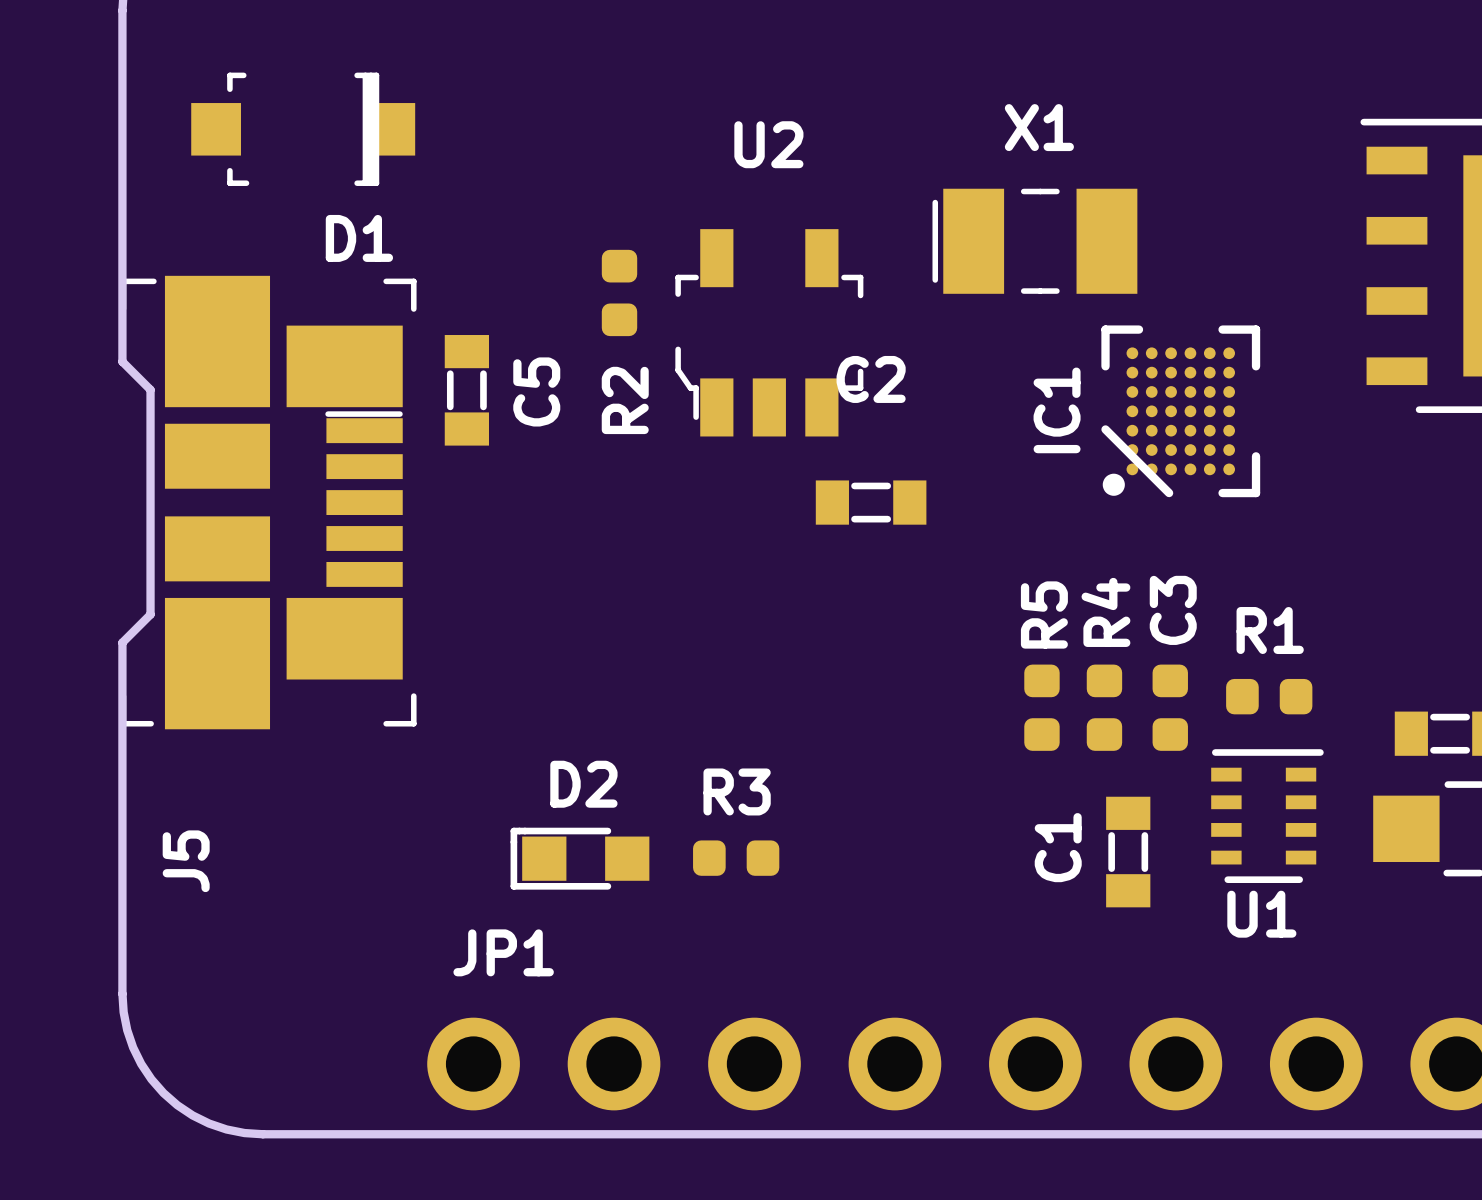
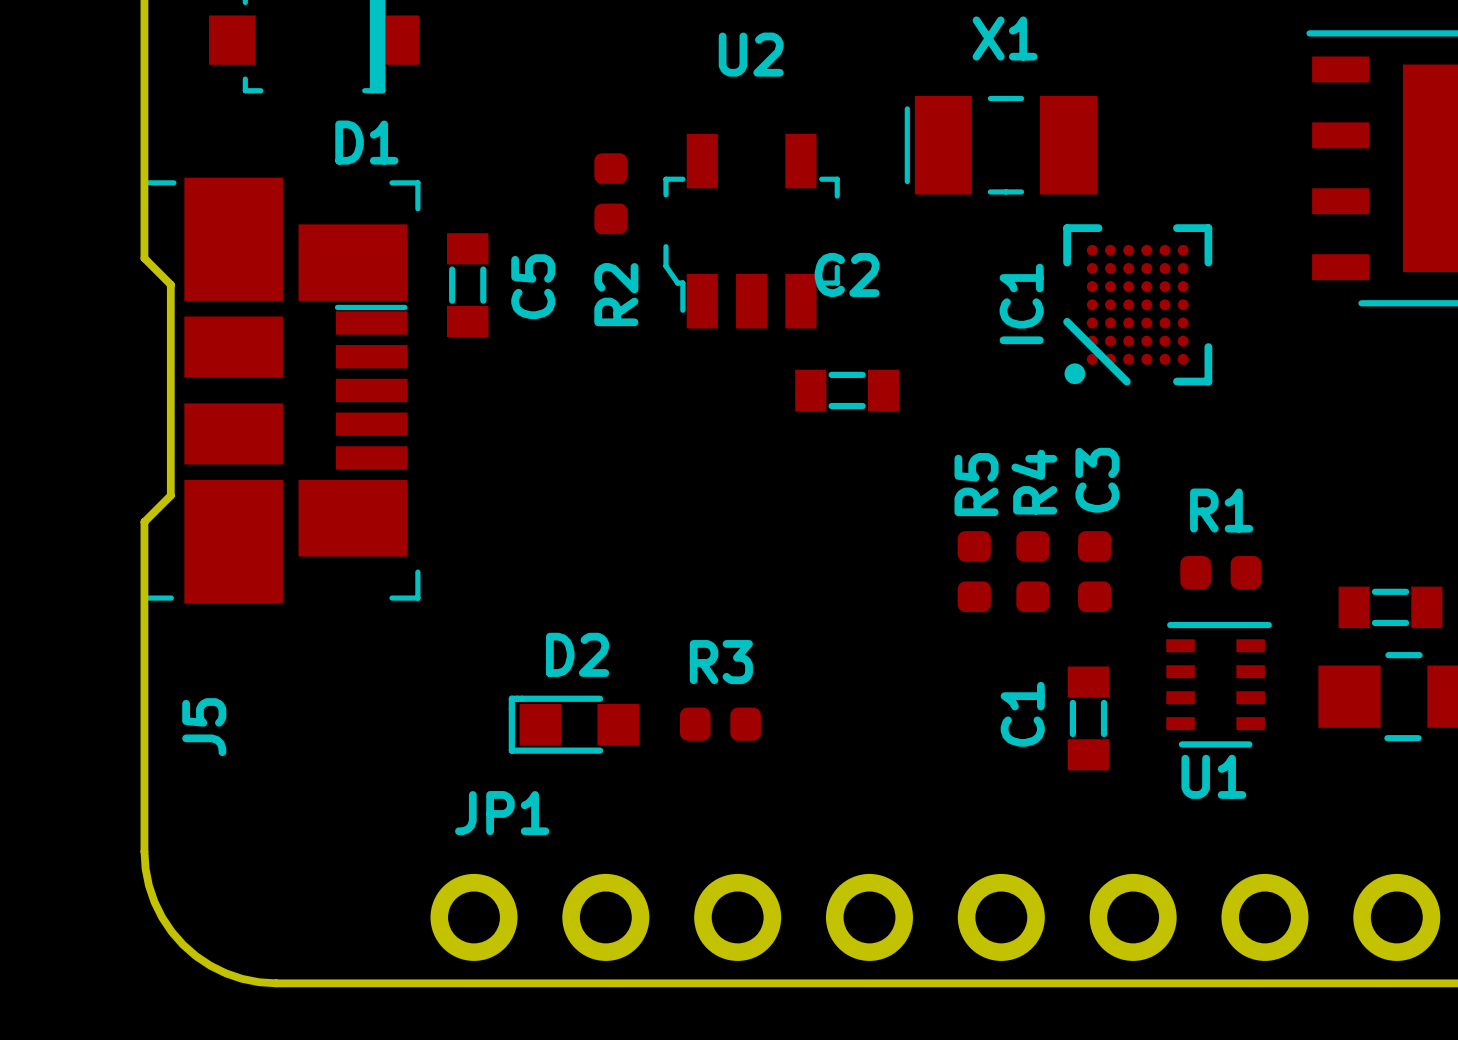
R5 position: (1041, 707) -> (974, 571)
R4 position: (1104, 707) -> (1032, 571)
C3 position: (1170, 707) -> (1094, 571)

